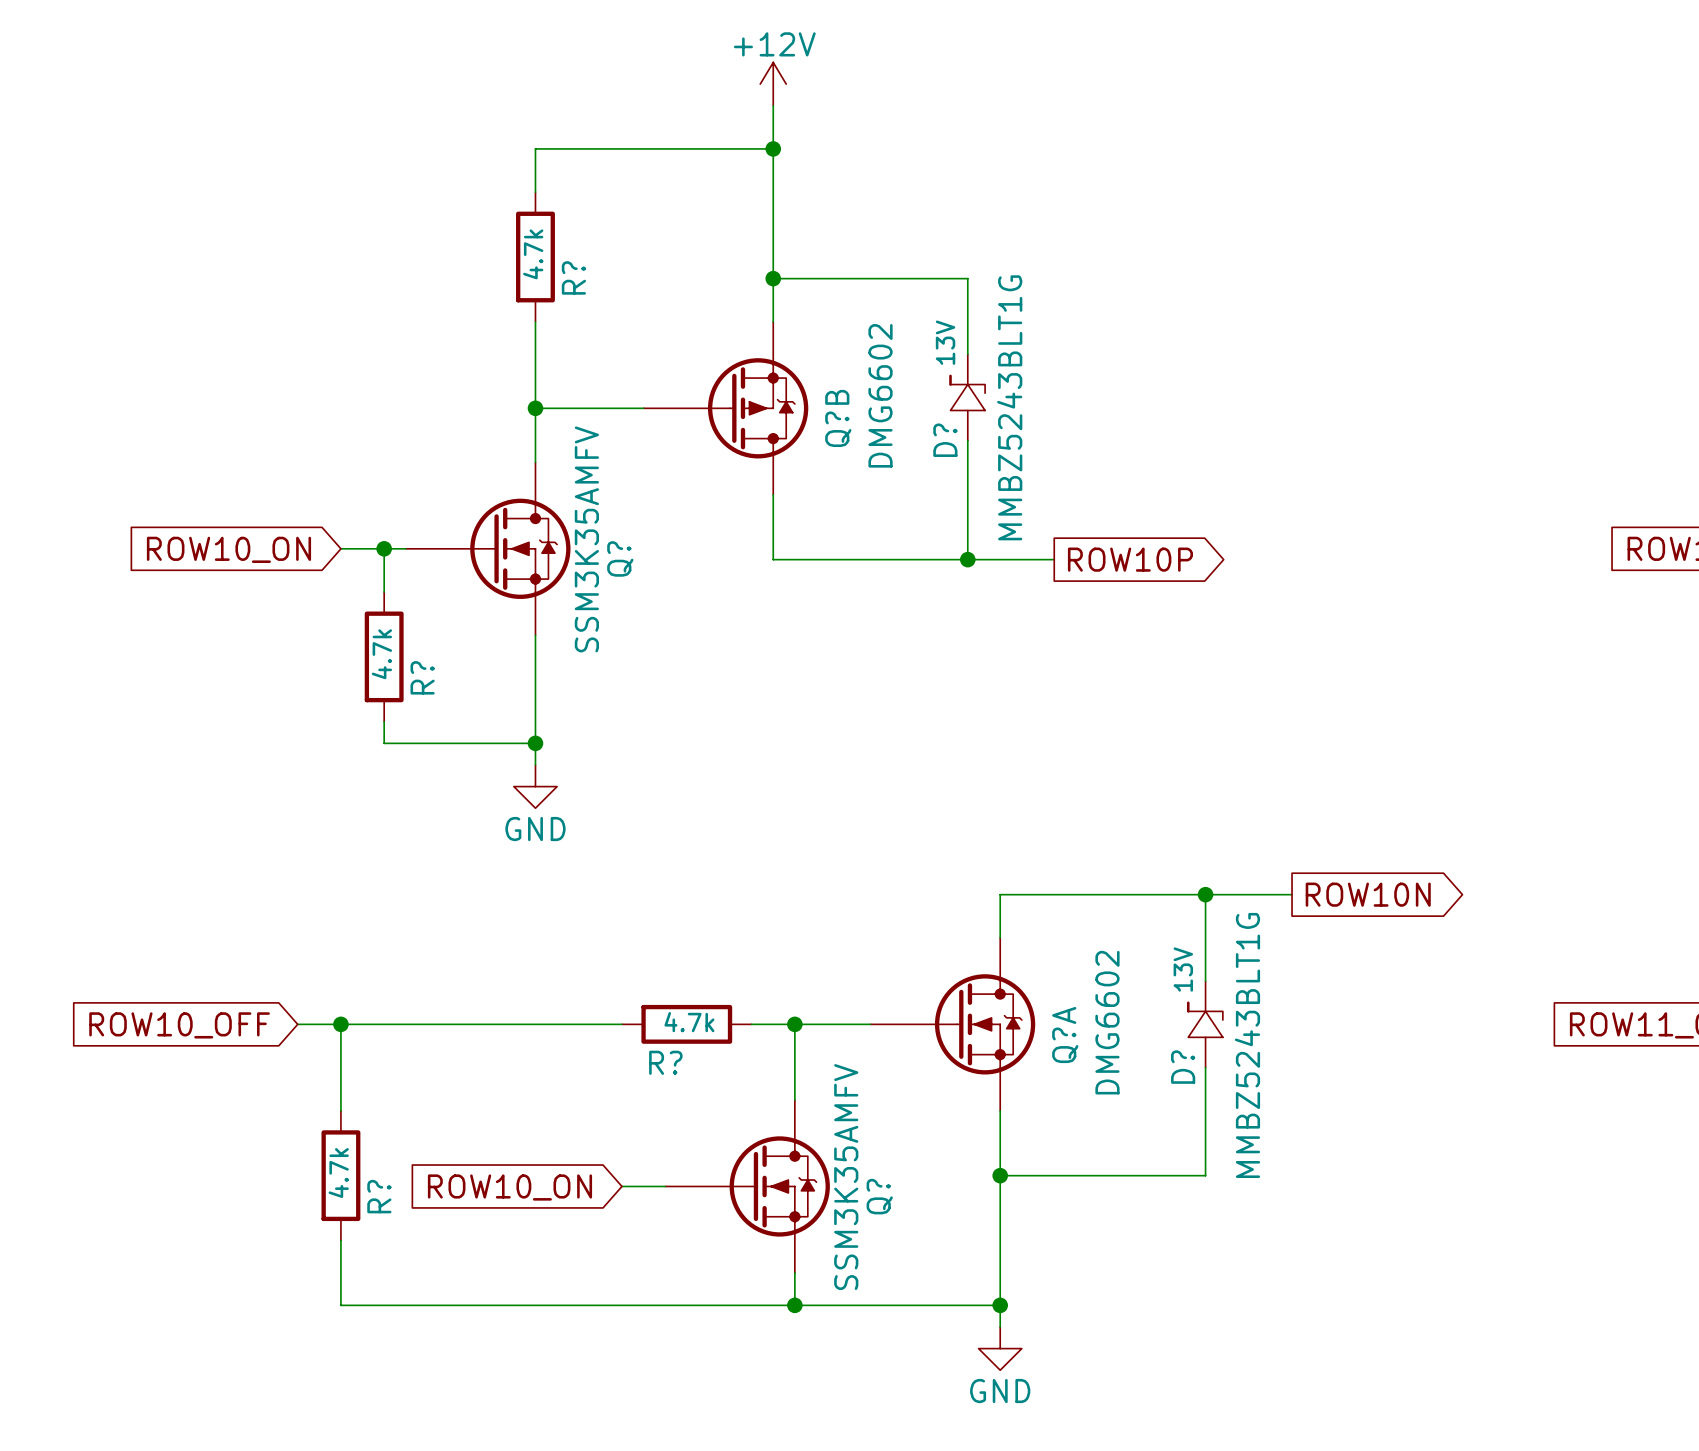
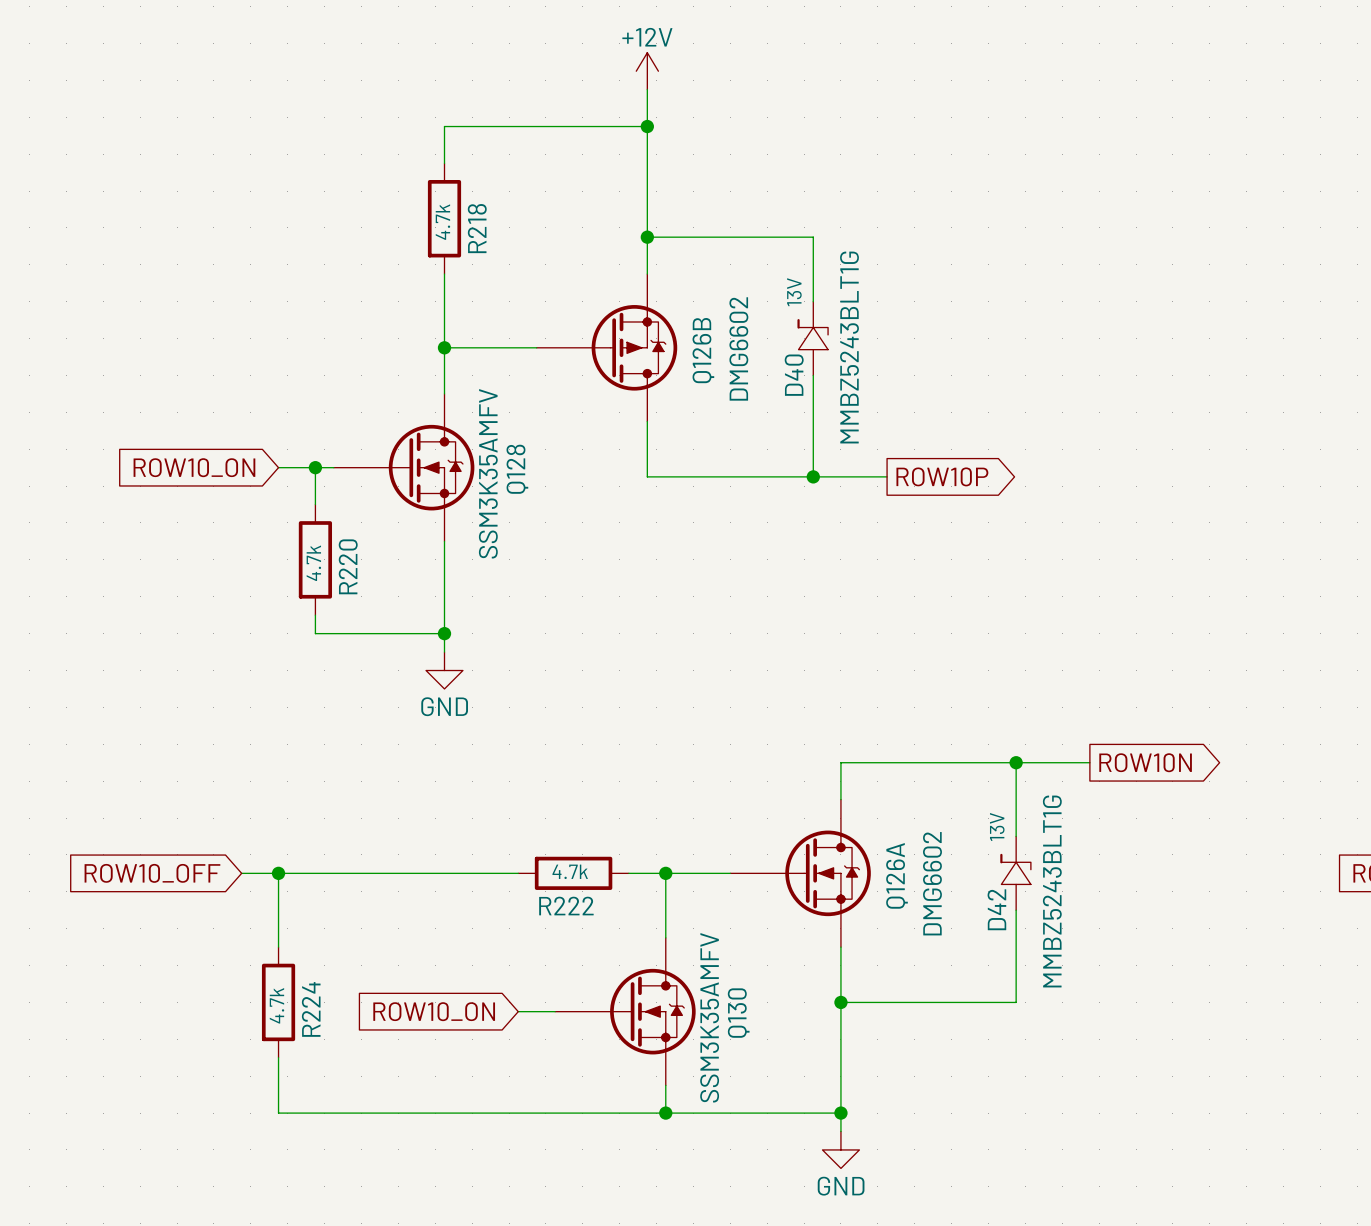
R? name: R? (573, 277) -> R218 (477, 228)
Q?B name: Q?B (838, 418) -> Q126B (703, 350)
D? name: D? (945, 440) -> D40 (794, 375)
Q? name: Q? (620, 558) -> Q128 (517, 469)
R? name: R? (422, 677) -> R220 (348, 566)
Q?A name: Q?A (1065, 1035) -> Q126A (897, 875)
R? name: R? (665, 1062) -> R222 (566, 906)
D? name: D? (1183, 1067) -> D42 (996, 909)
R? name: R? (379, 1196) -> R224 (311, 1009)
Q? name: Q? (879, 1196) -> Q130 (738, 1013)

